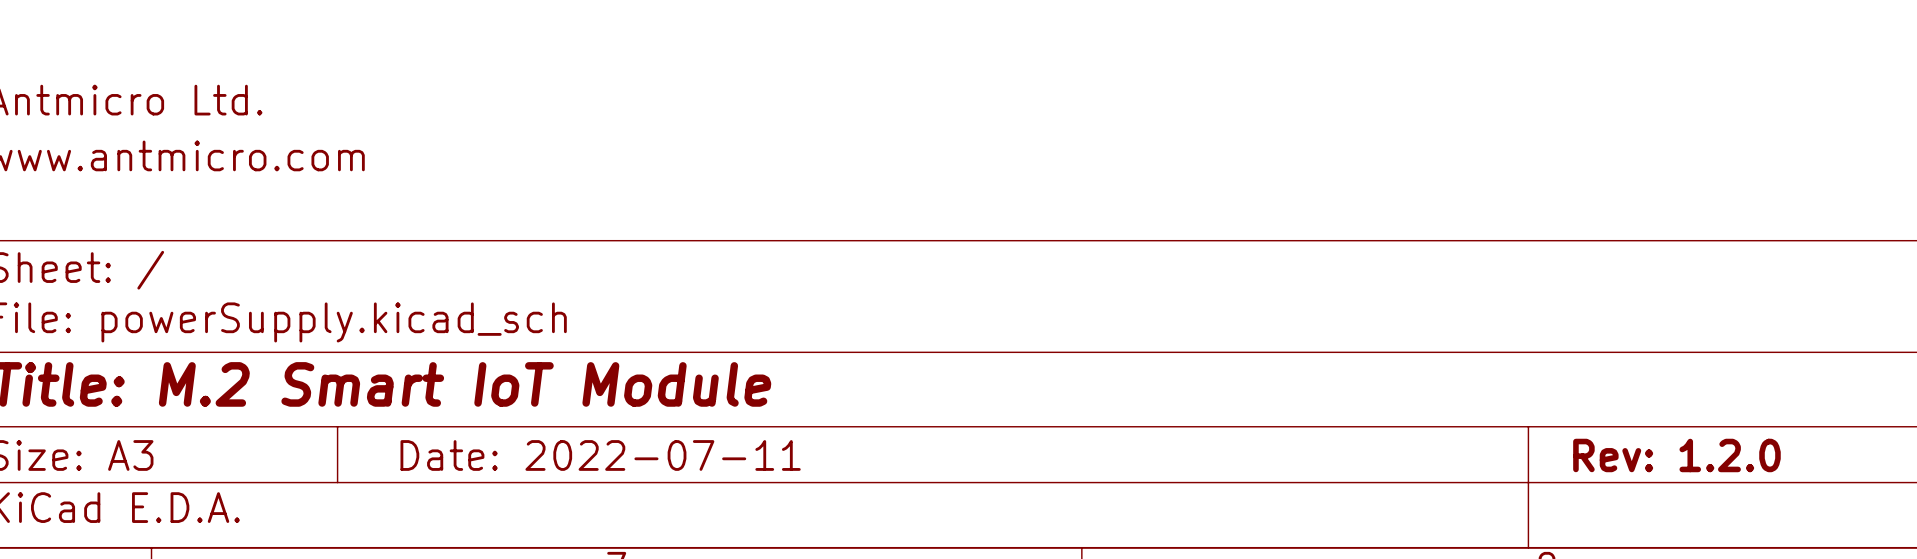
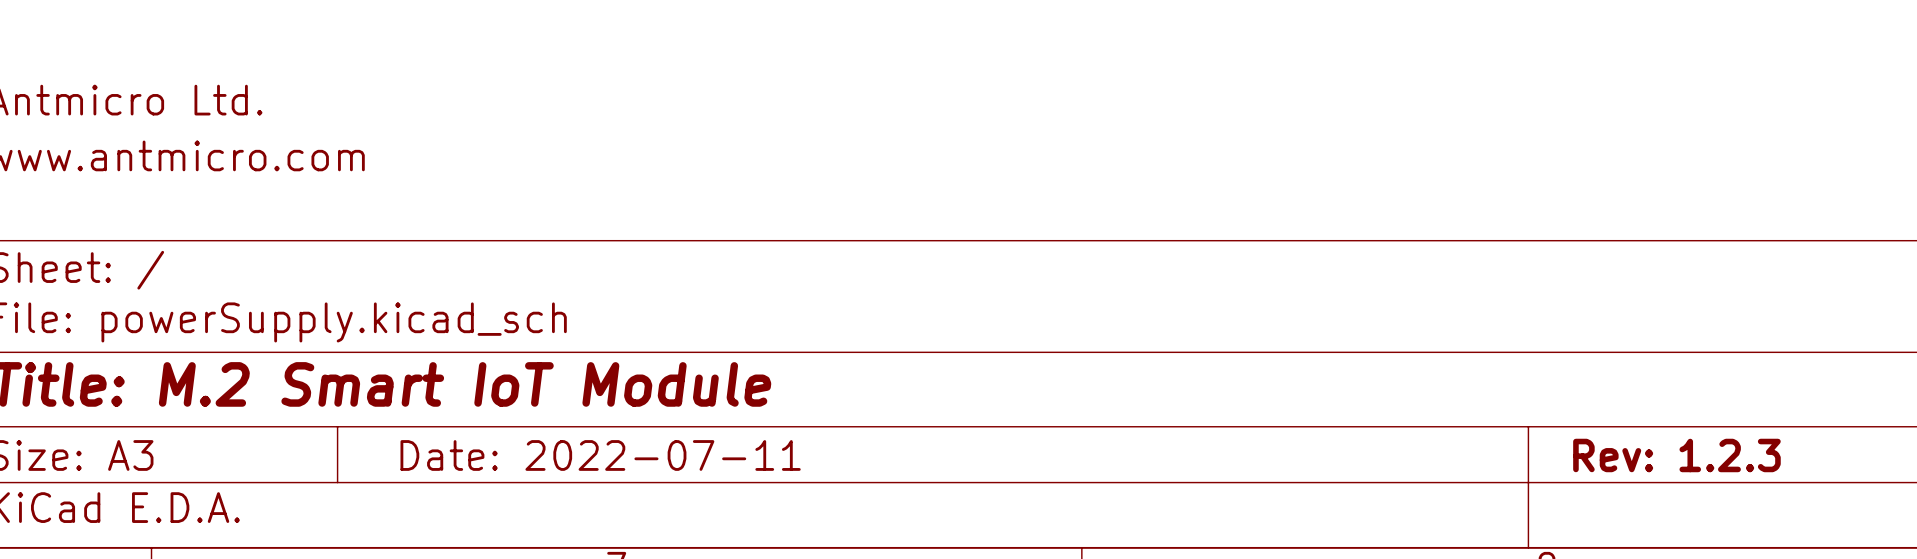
title block: Rev: 1.2.0 (1676, 455) -> Rev: 1.2.3 (1676, 455)

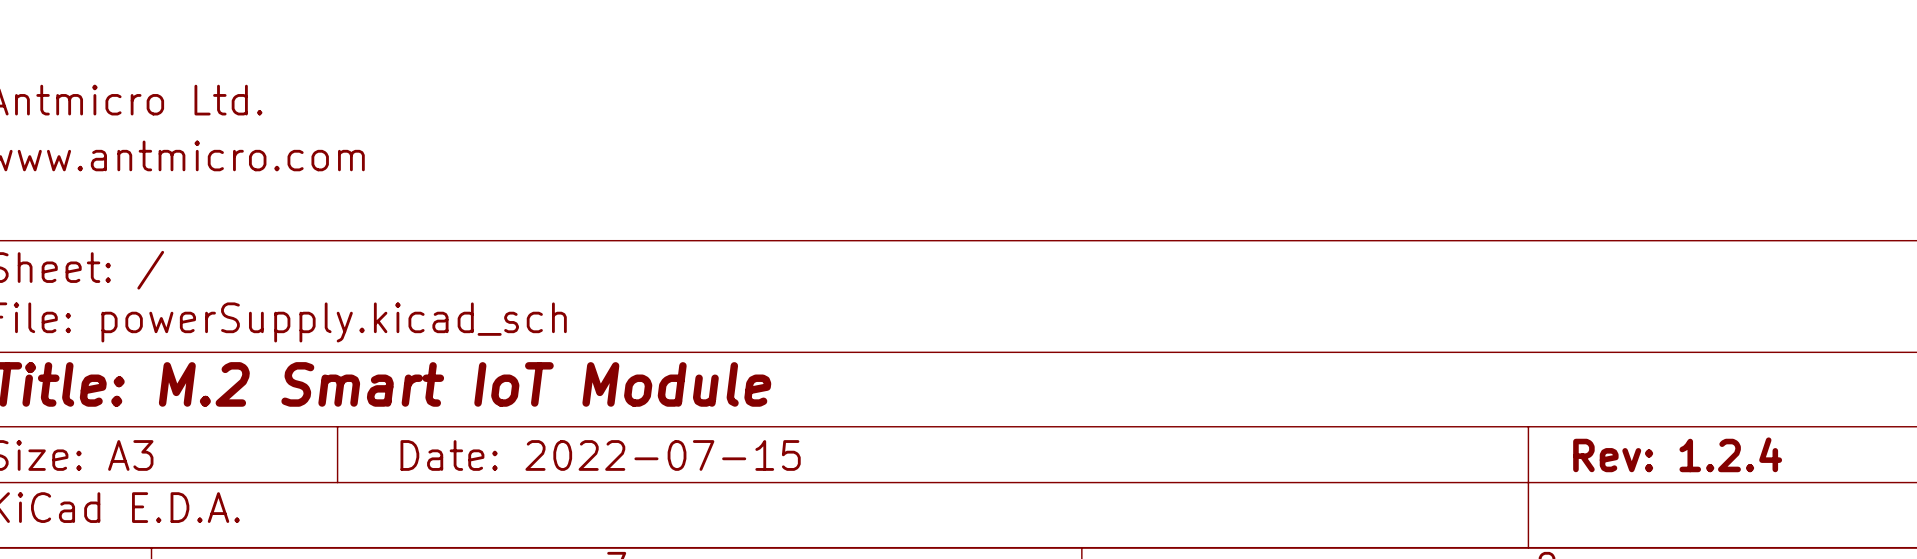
title block: Date: 2022-07-11 (600, 455) -> Date: 2022-07-15 (600, 455)
title block: Rev: 1.2.3 (1676, 455) -> Rev: 1.2.4 (1677, 454)

